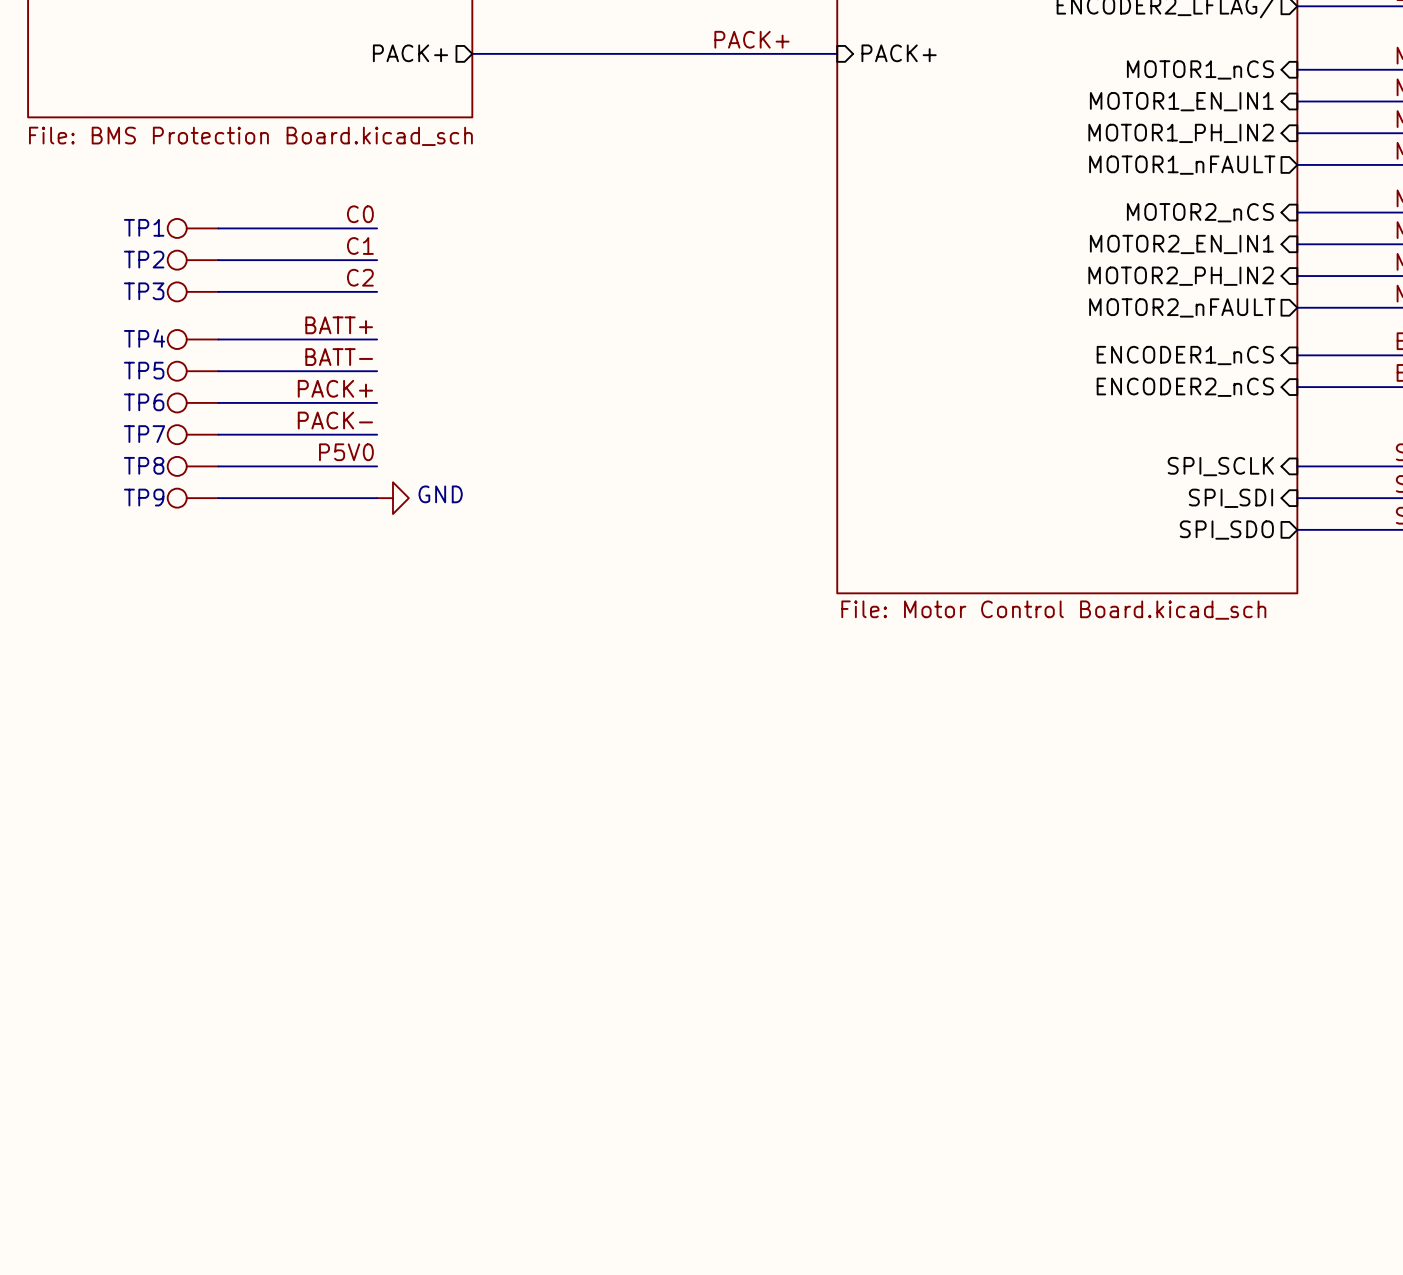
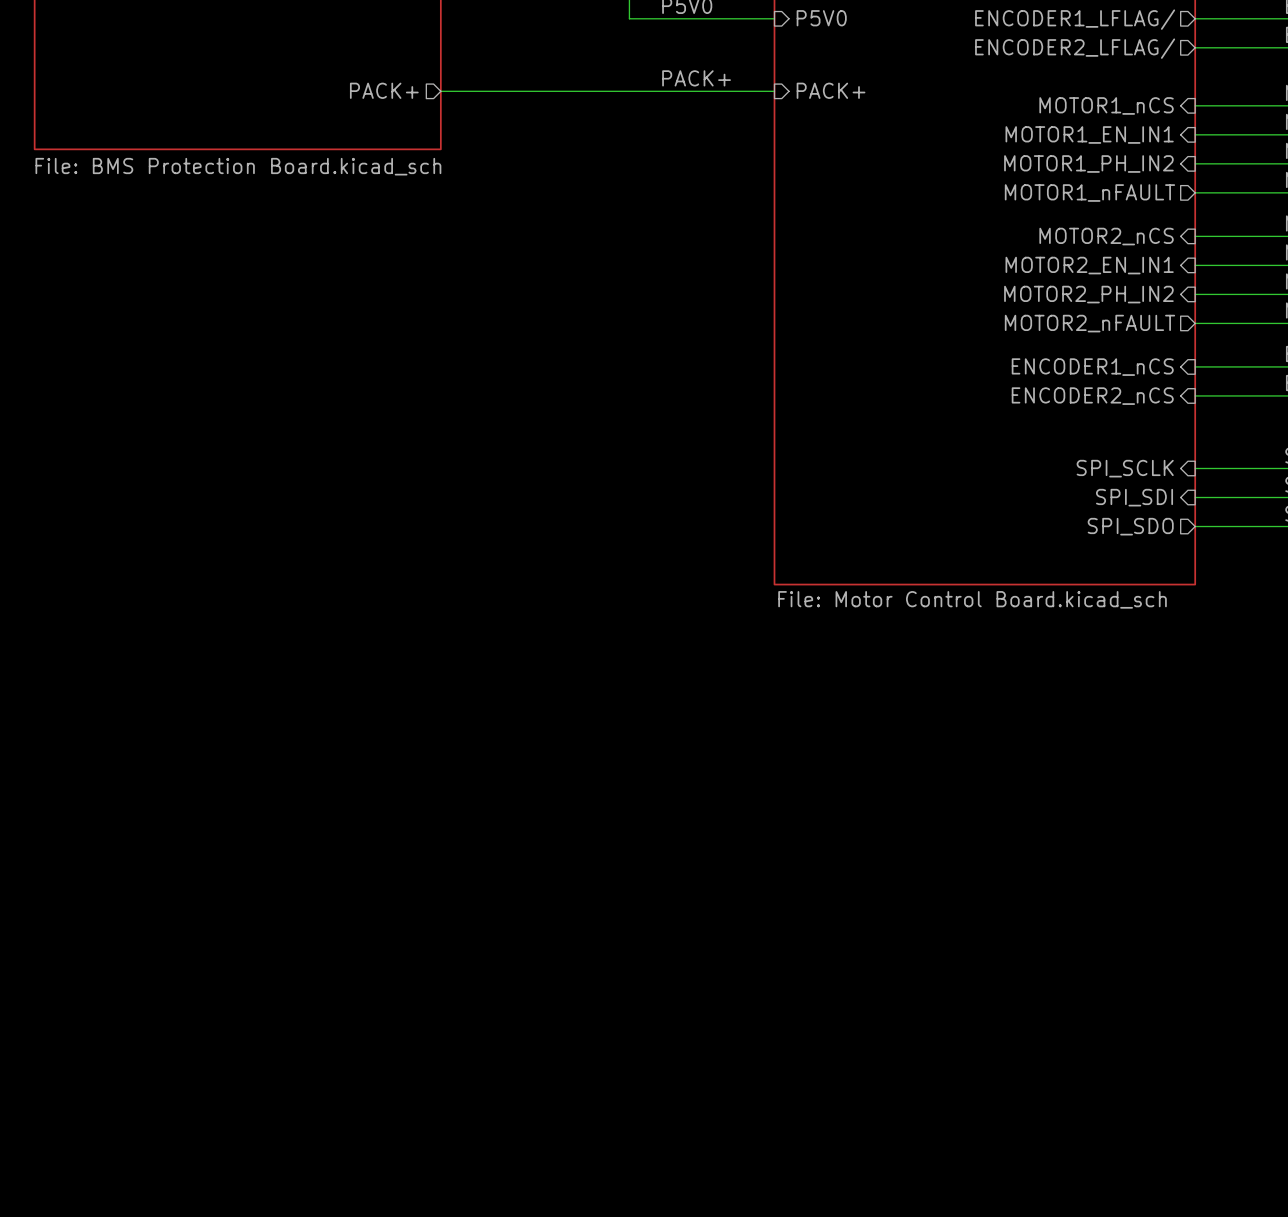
label: C0 (360, 214) -> none
TP1: (193, 228) -> none
wire: (218, 228) (377, 228) -> none
label: C1 (360, 246) -> none
TP2: (193, 260) -> none
wire: (218, 260) (377, 260) -> none
label: C2 (360, 277) -> none
TP3: (193, 291) -> none
wire: (218, 291) (377, 291) -> none
label: BATT+ (339, 325) -> none
TP4: (193, 339) -> none
wire: (218, 339) (377, 339) -> none
label: BATT- (339, 357) -> none
TP5: (193, 371) -> none
wire: (218, 371) (377, 371) -> none
label: PACK+ (335, 388) -> none
TP6: (193, 402) -> none
wire: (218, 402) (377, 402) -> none
label: PACK- (335, 420) -> none
TP7: (193, 434) -> none
wire: (218, 434) (377, 434) -> none
label: P5V0 (346, 452) -> none
TP8: (193, 466) -> none
wire: (218, 466) (377, 466) -> none
TP9: (193, 498) -> none
wire: (218, 498) (377, 498) -> none
power symbol: GND (392, 498) -> none

